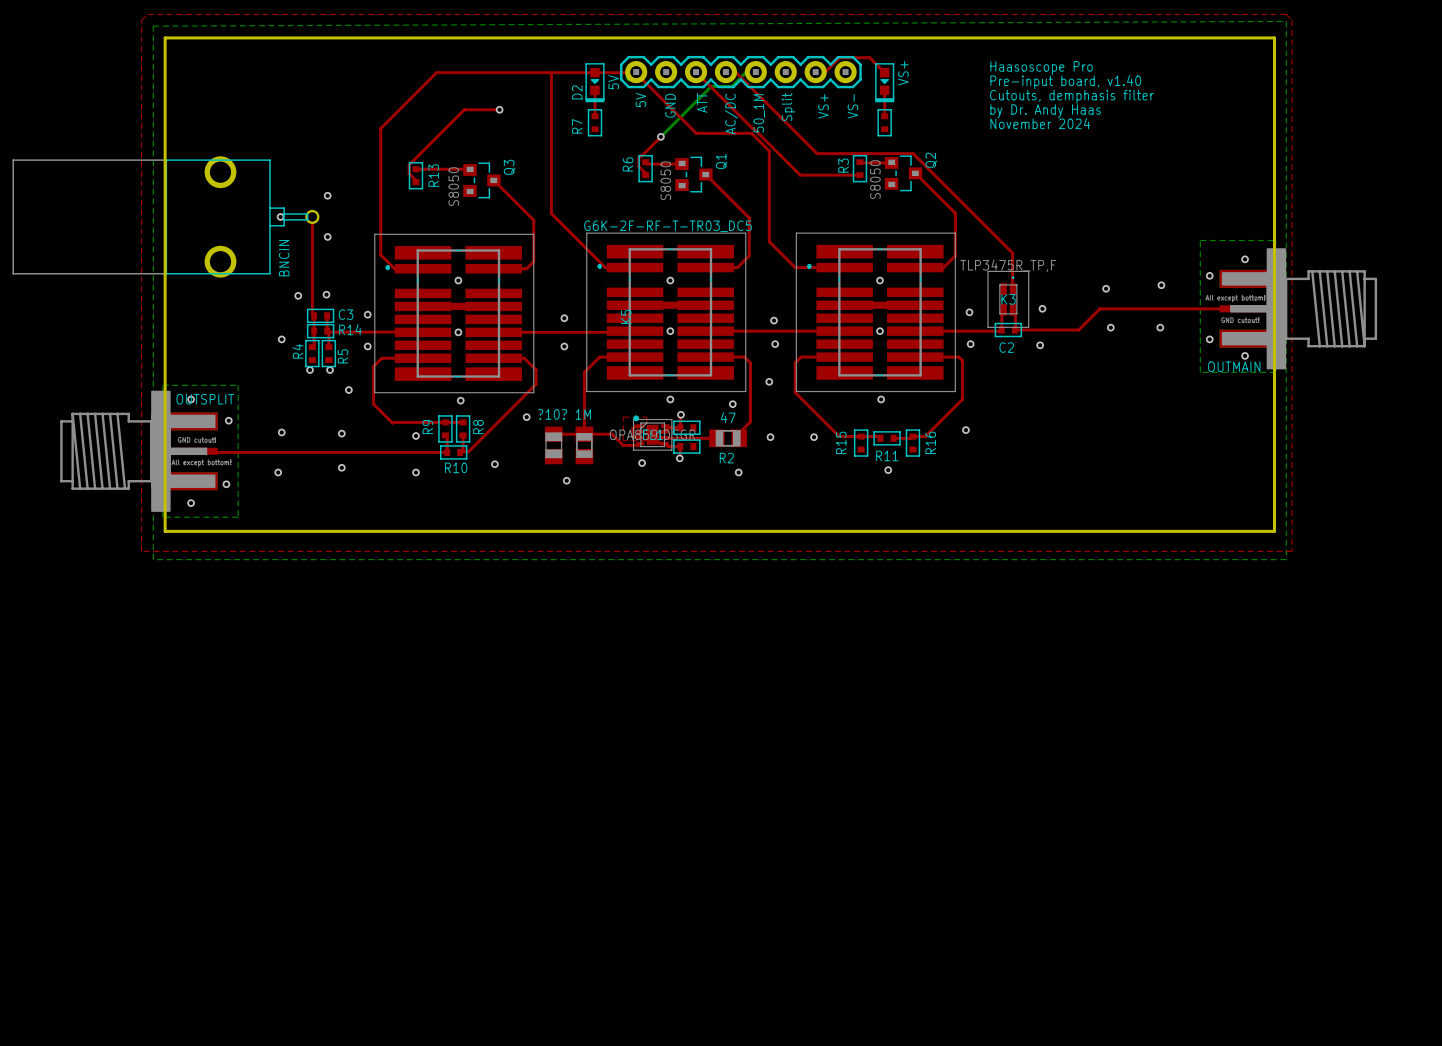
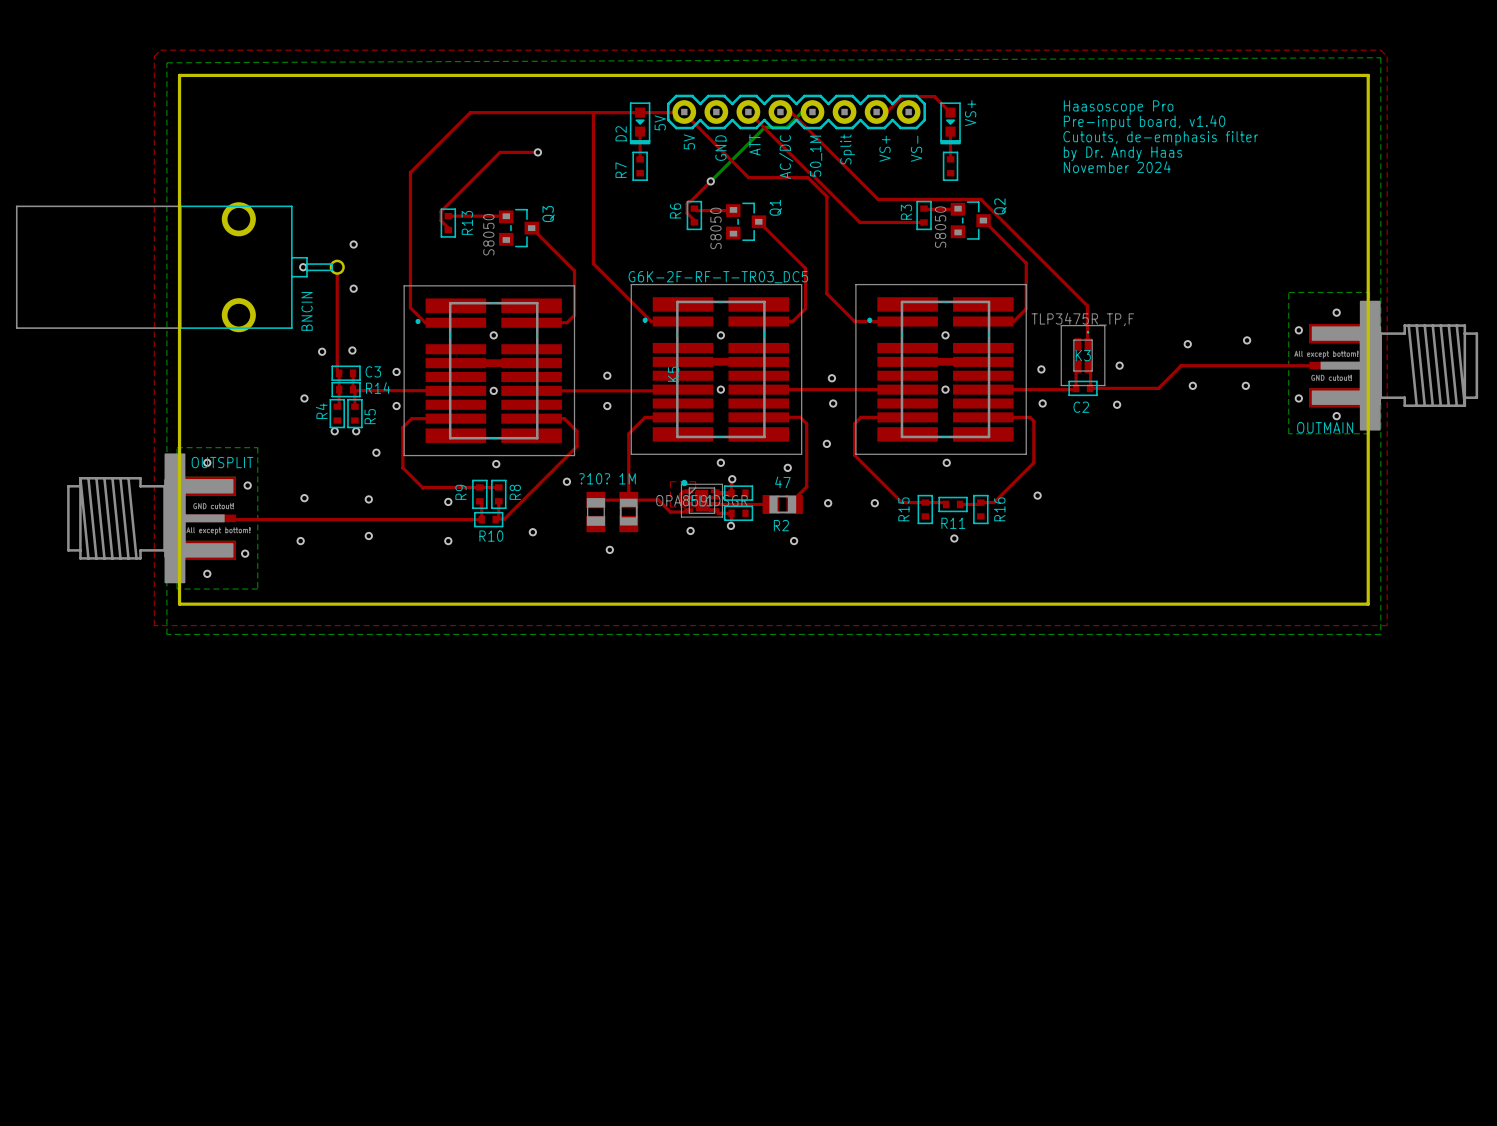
text: Cutouts, demphasis filter (1071, 96) -> Cutouts, de-emphasis filter (1160, 138)

